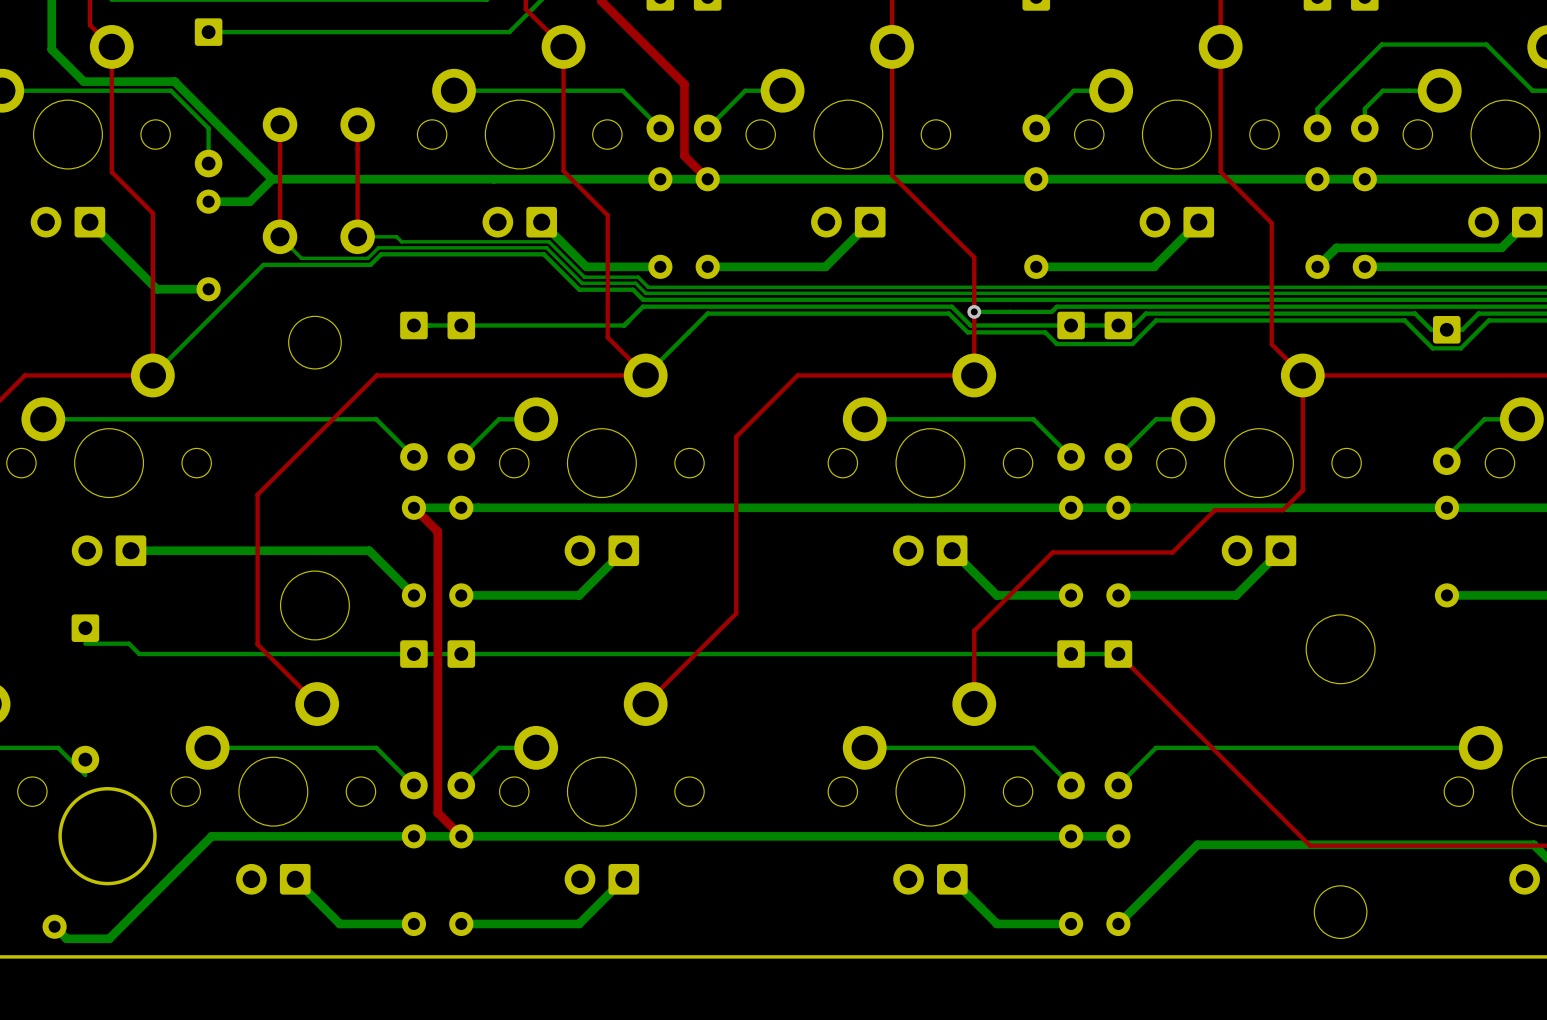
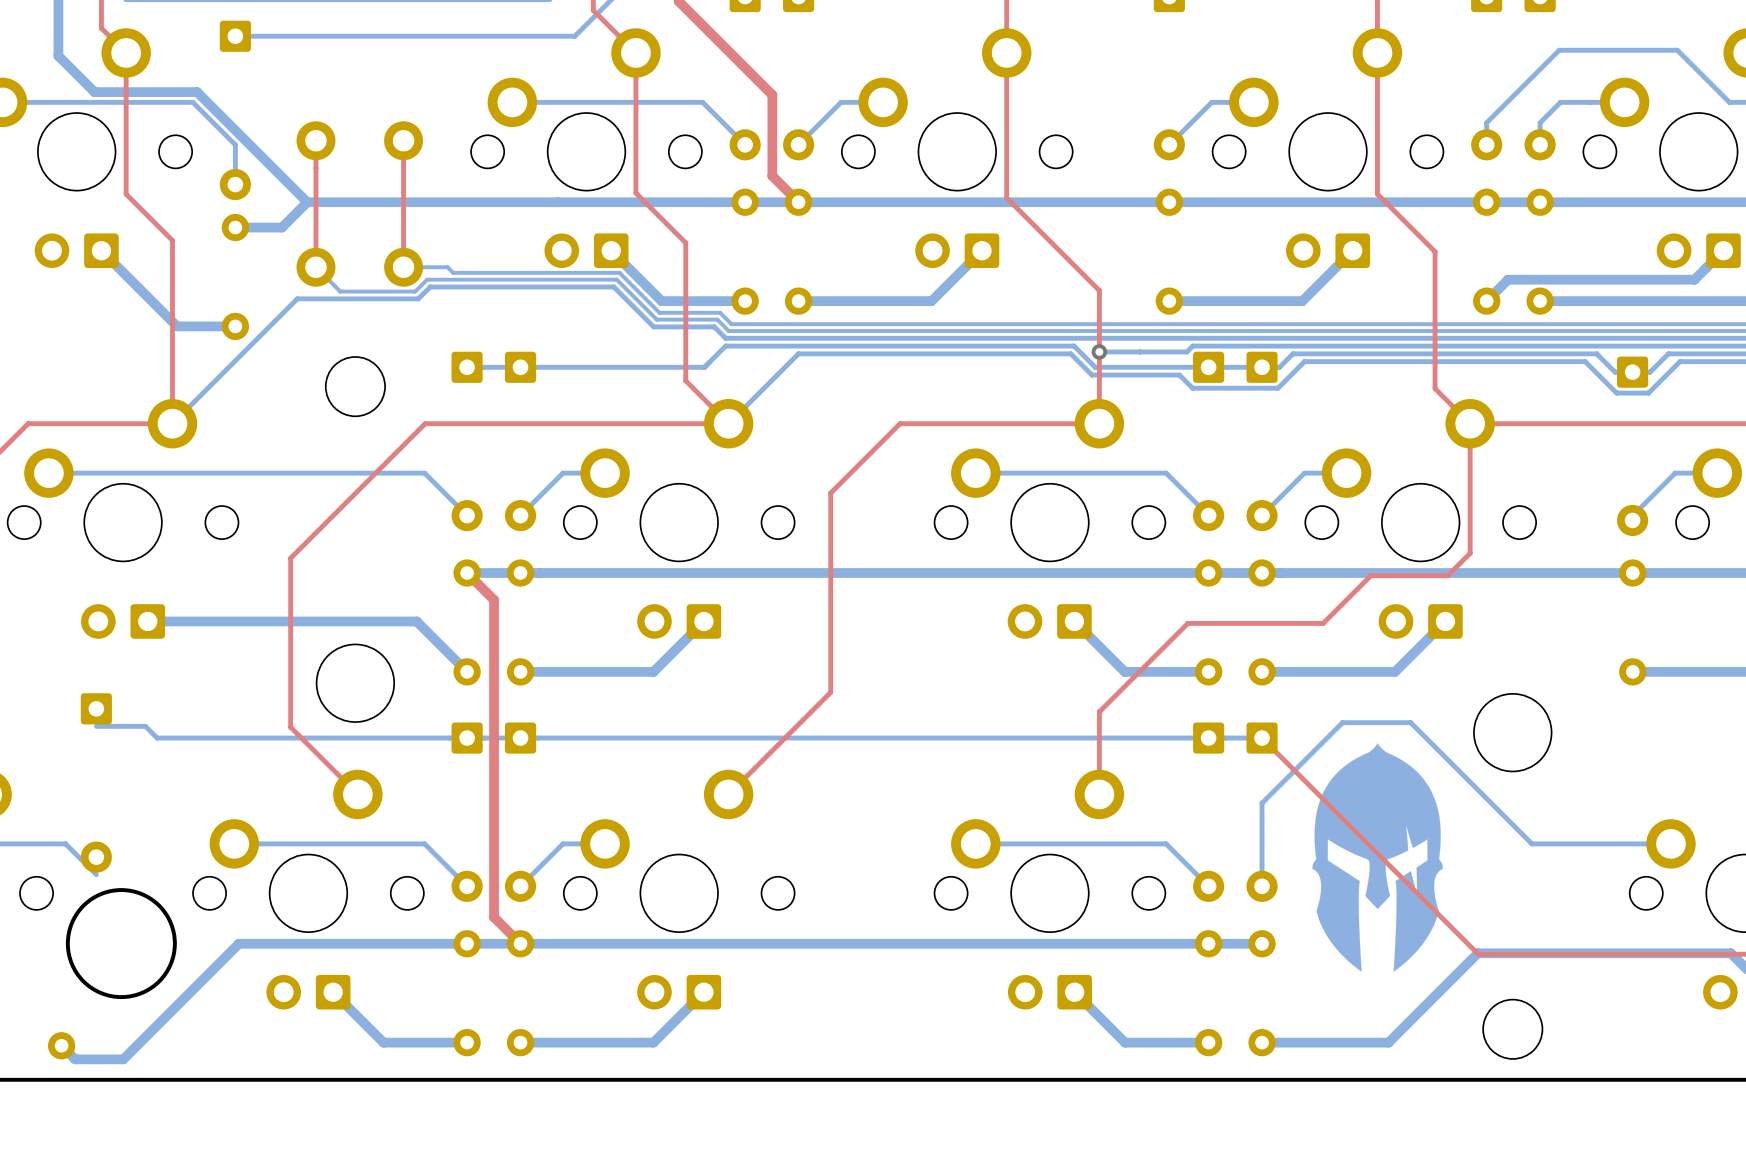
bottom track: (1357, 747) (1156, 747) (1118, 785) -> (1531, 843) (1410, 722) (1342, 722) (1262, 803) (1262, 886)
part: none -> (1377, 857)
bottom track: (1309, 844) (1197, 844) (1118, 923) -> (1477, 953) (1388, 1042) (1262, 1042)

